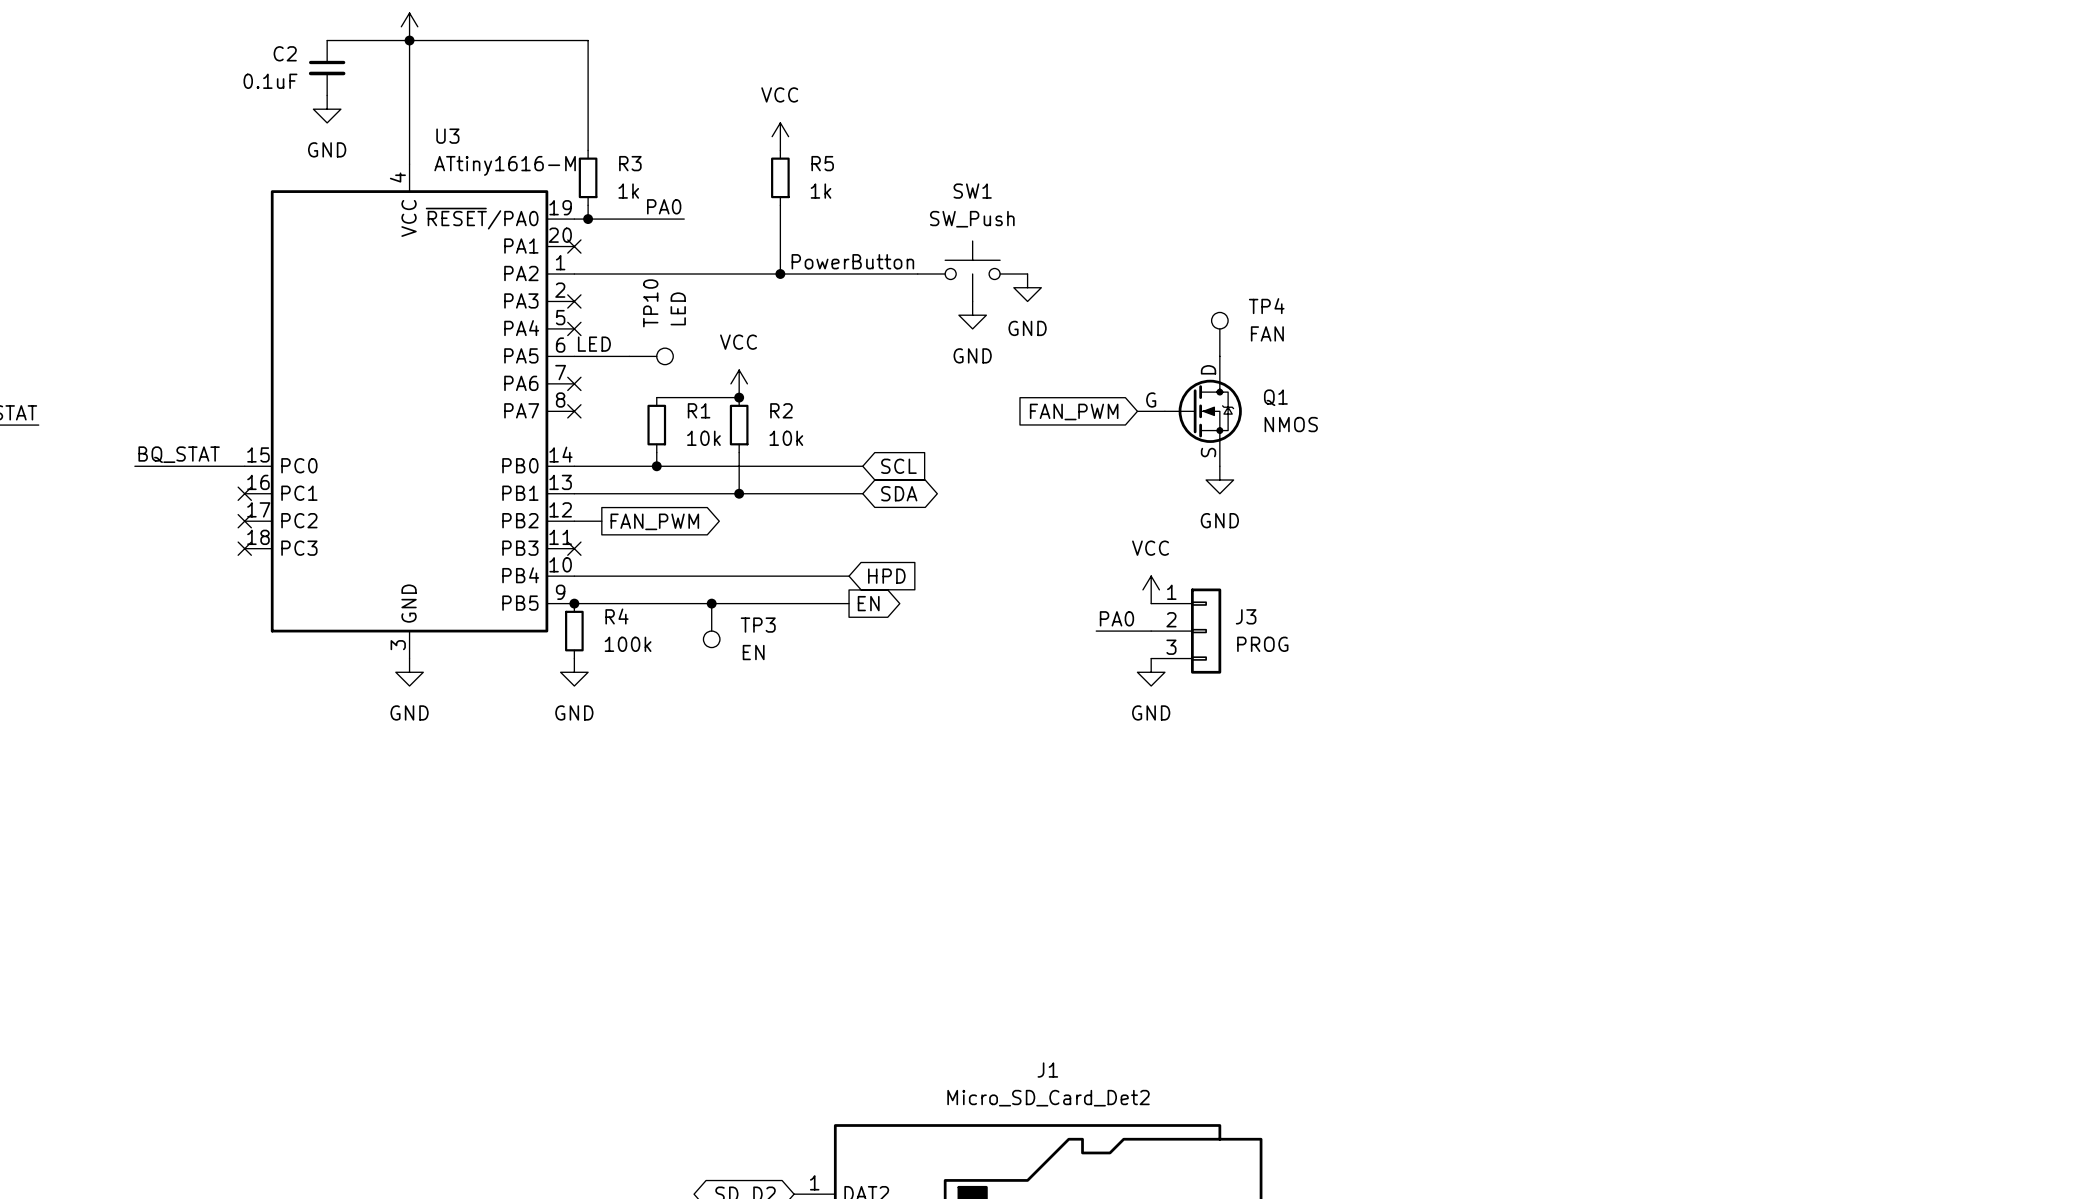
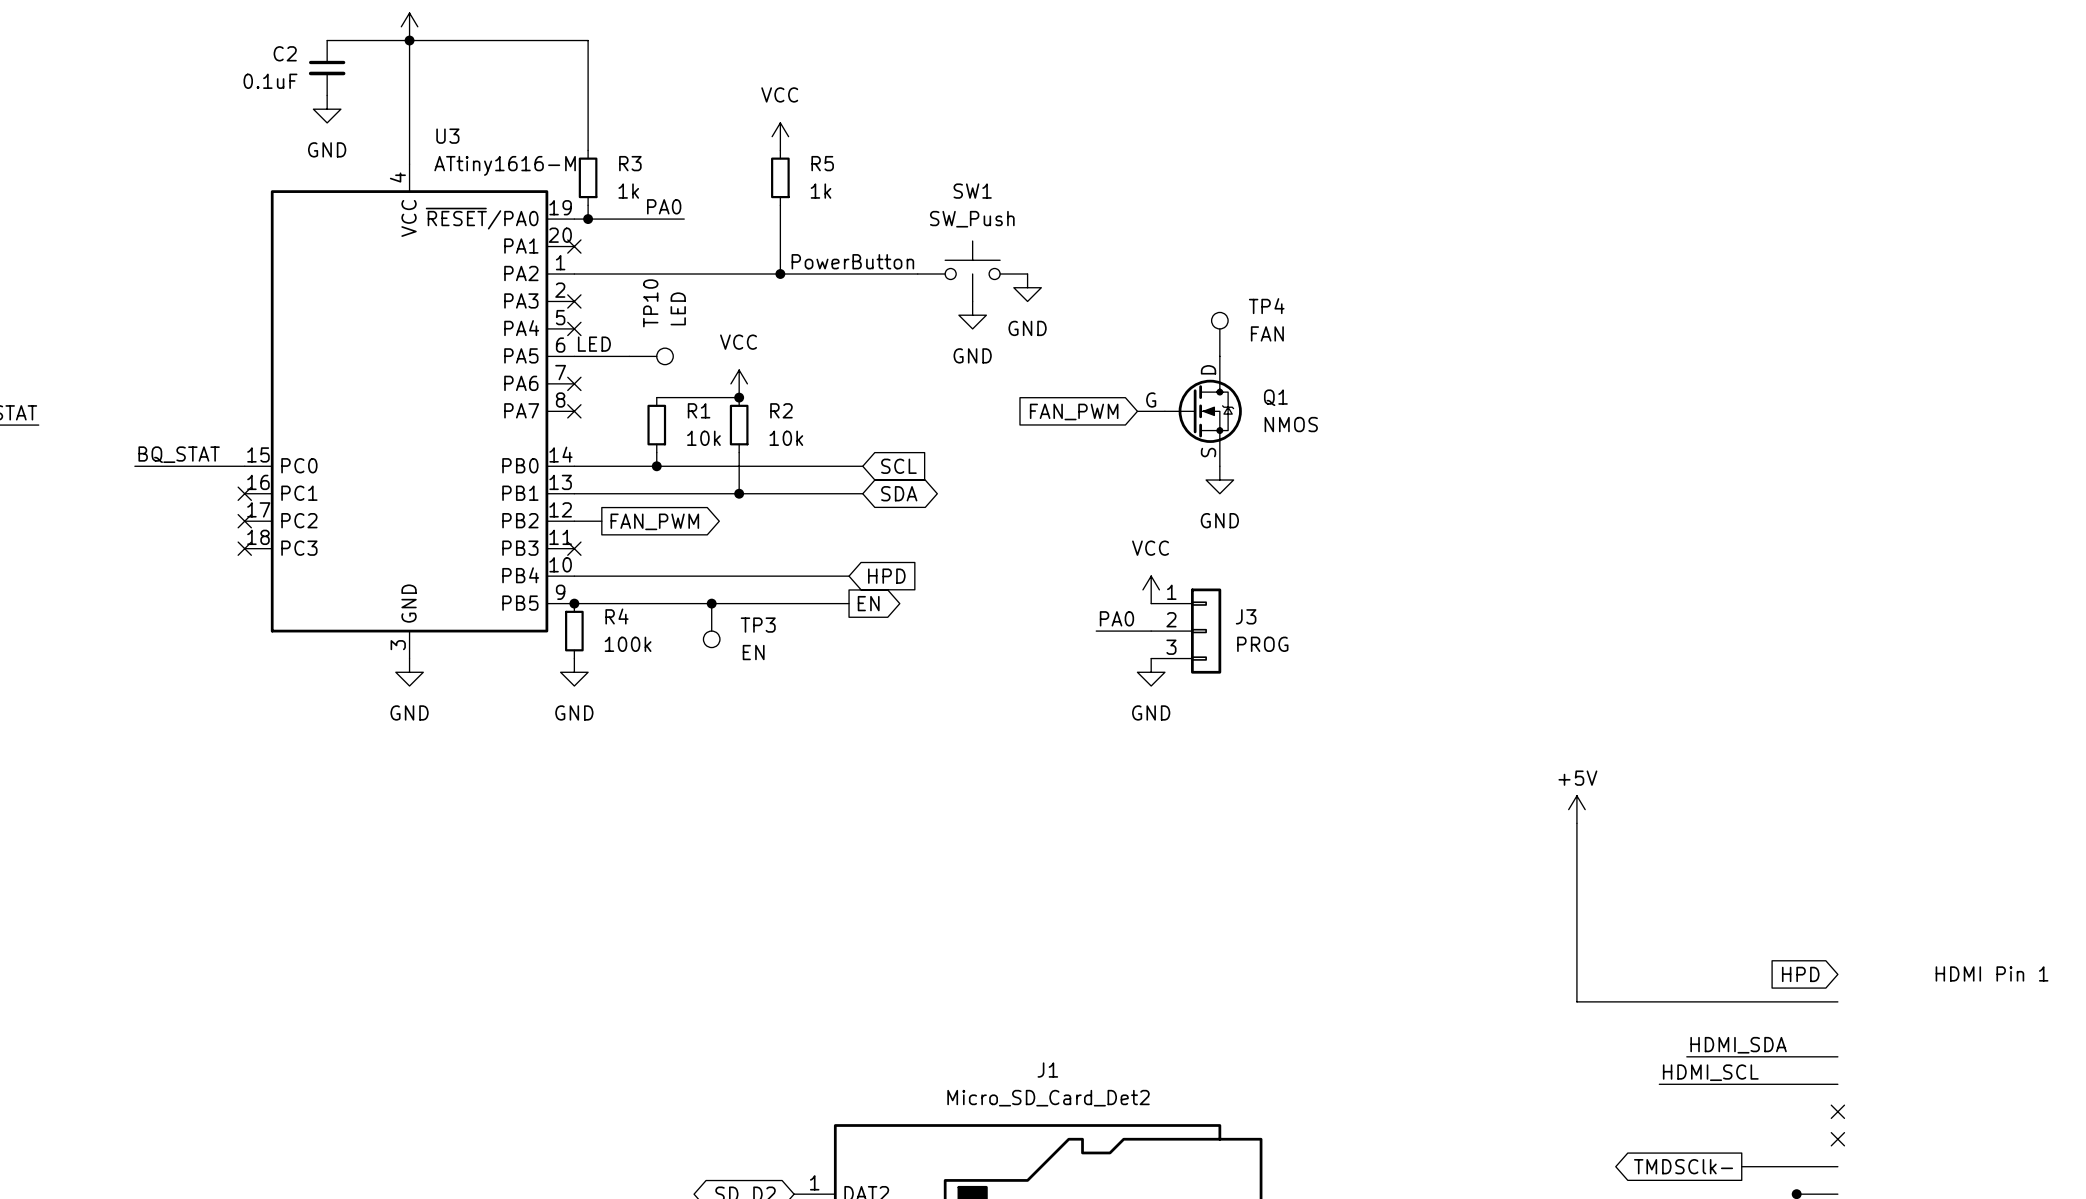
power symbol: none -> +5V (1576, 809)
wire: none -> (1576, 823) (1576, 1001) (1837, 1001)
text: none -> HDMI Pin 1 (1992, 973)
global label: none -> HPD (1800, 974)
label: none -> HDMI_SDA (1738, 1045)
wire: none -> (1686, 1056) (1837, 1056)
label: none -> HDMI_SCL (1710, 1072)
wire: none -> (1659, 1084) (1837, 1084)
no-connect mark: none -> (1837, 1111)
no-connect mark: none -> (1837, 1139)
global label: none -> TMDSClk- (1683, 1166)
wire: none -> (1741, 1166) (1837, 1166)
wire: none -> (1796, 1194) (1837, 1194)
junction: none -> (1796, 1194)

